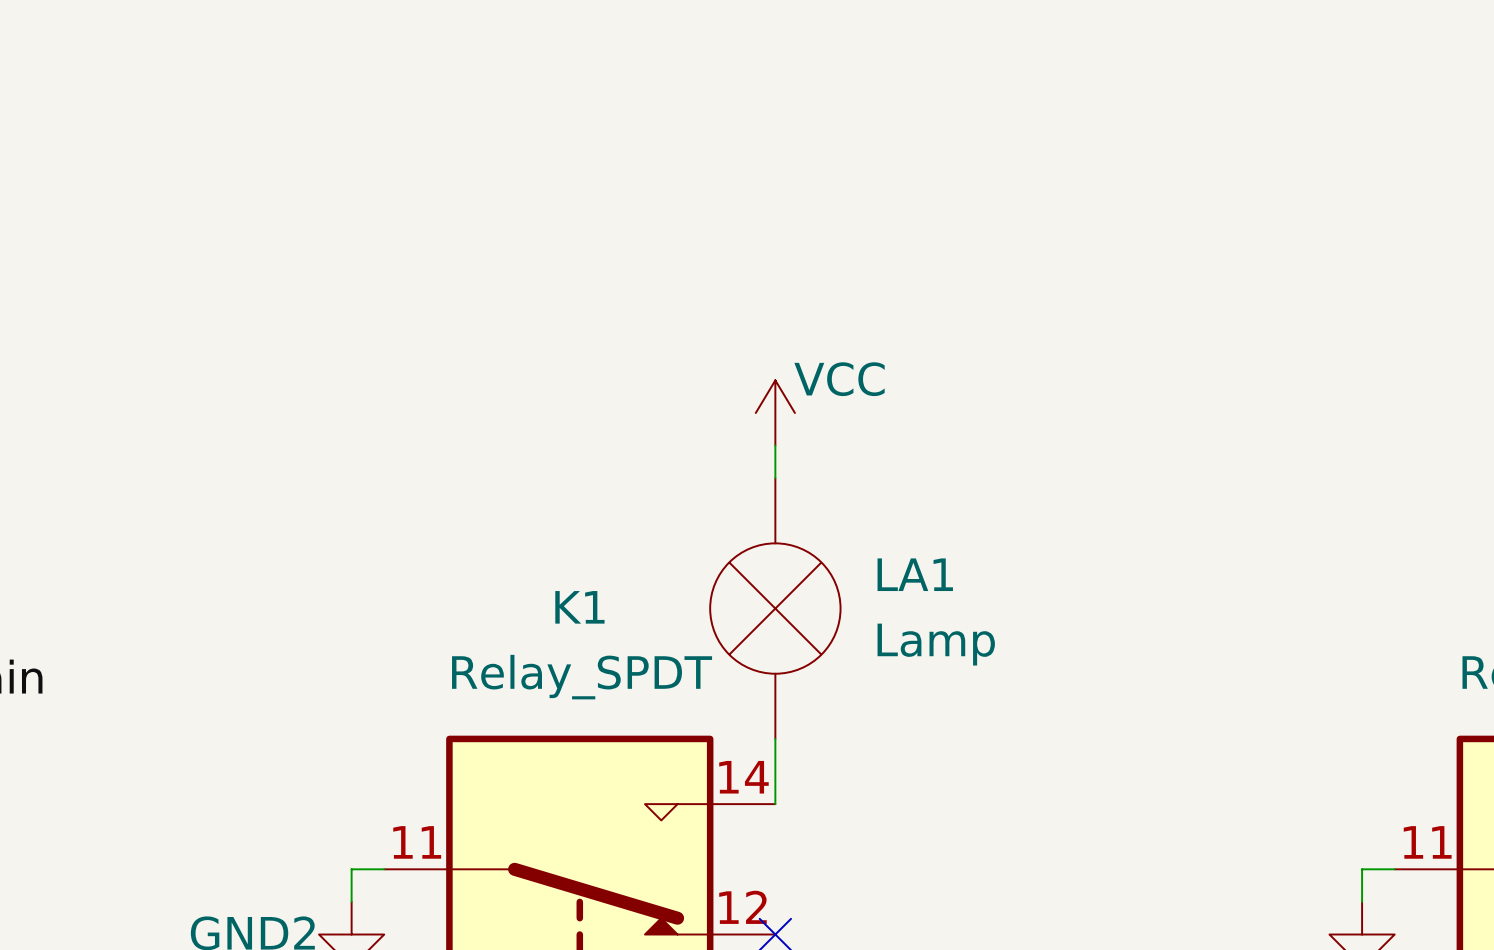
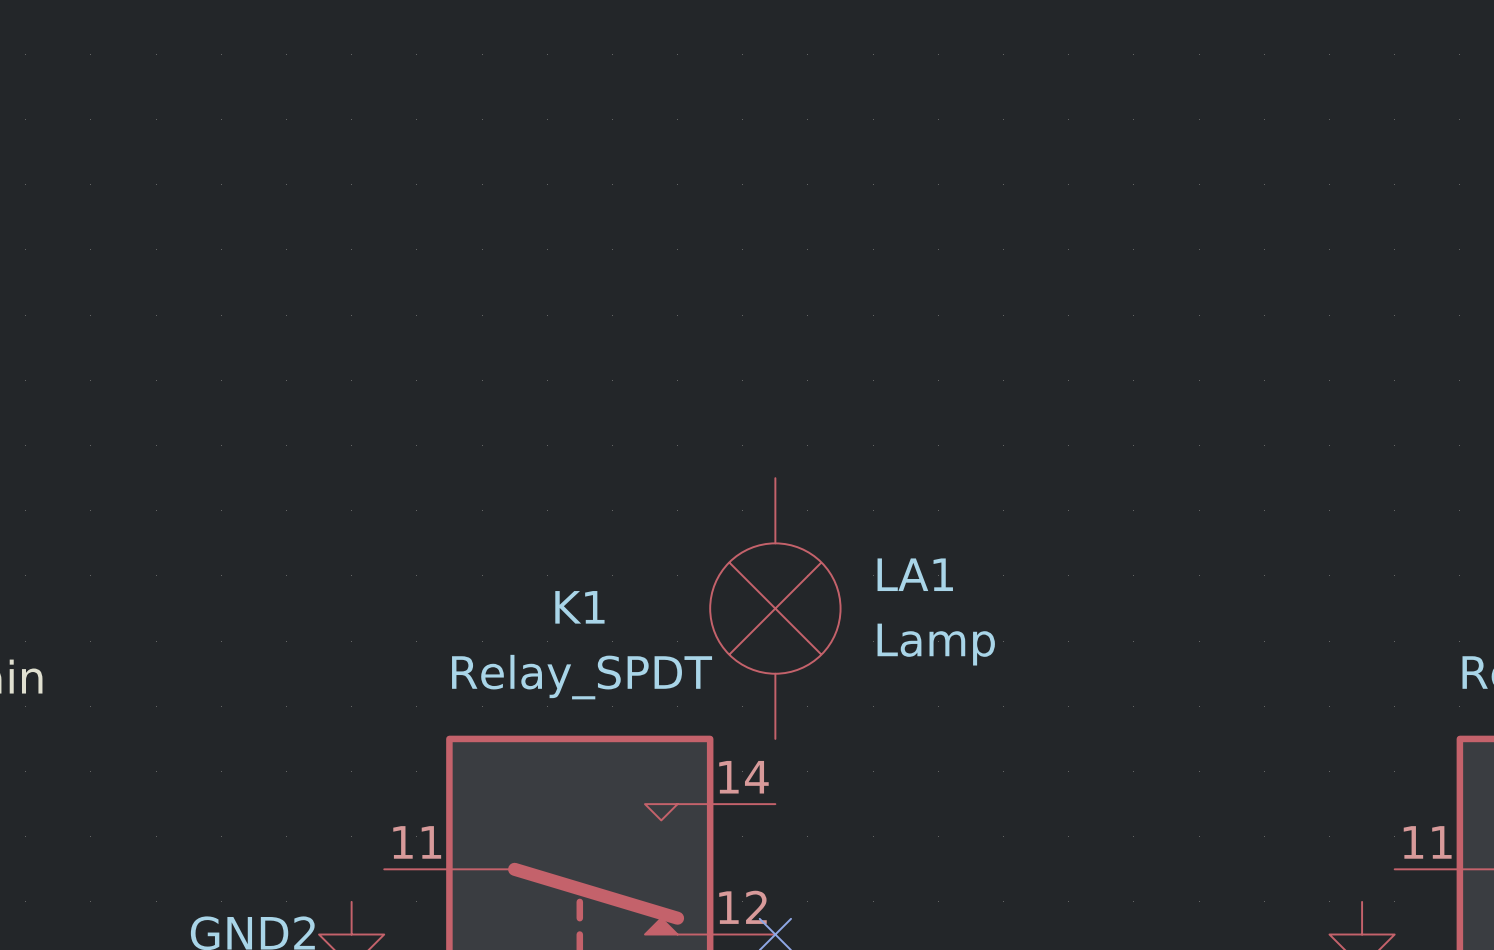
power symbol: VCC (775, 412) -> none
wire: (775, 445) (775, 478) -> none
wire: (775, 738) (775, 804) -> none
wire: (384, 869) (351, 869) (351, 901) -> none
wire: (1394, 869) (1362, 869) (1362, 901) -> none

